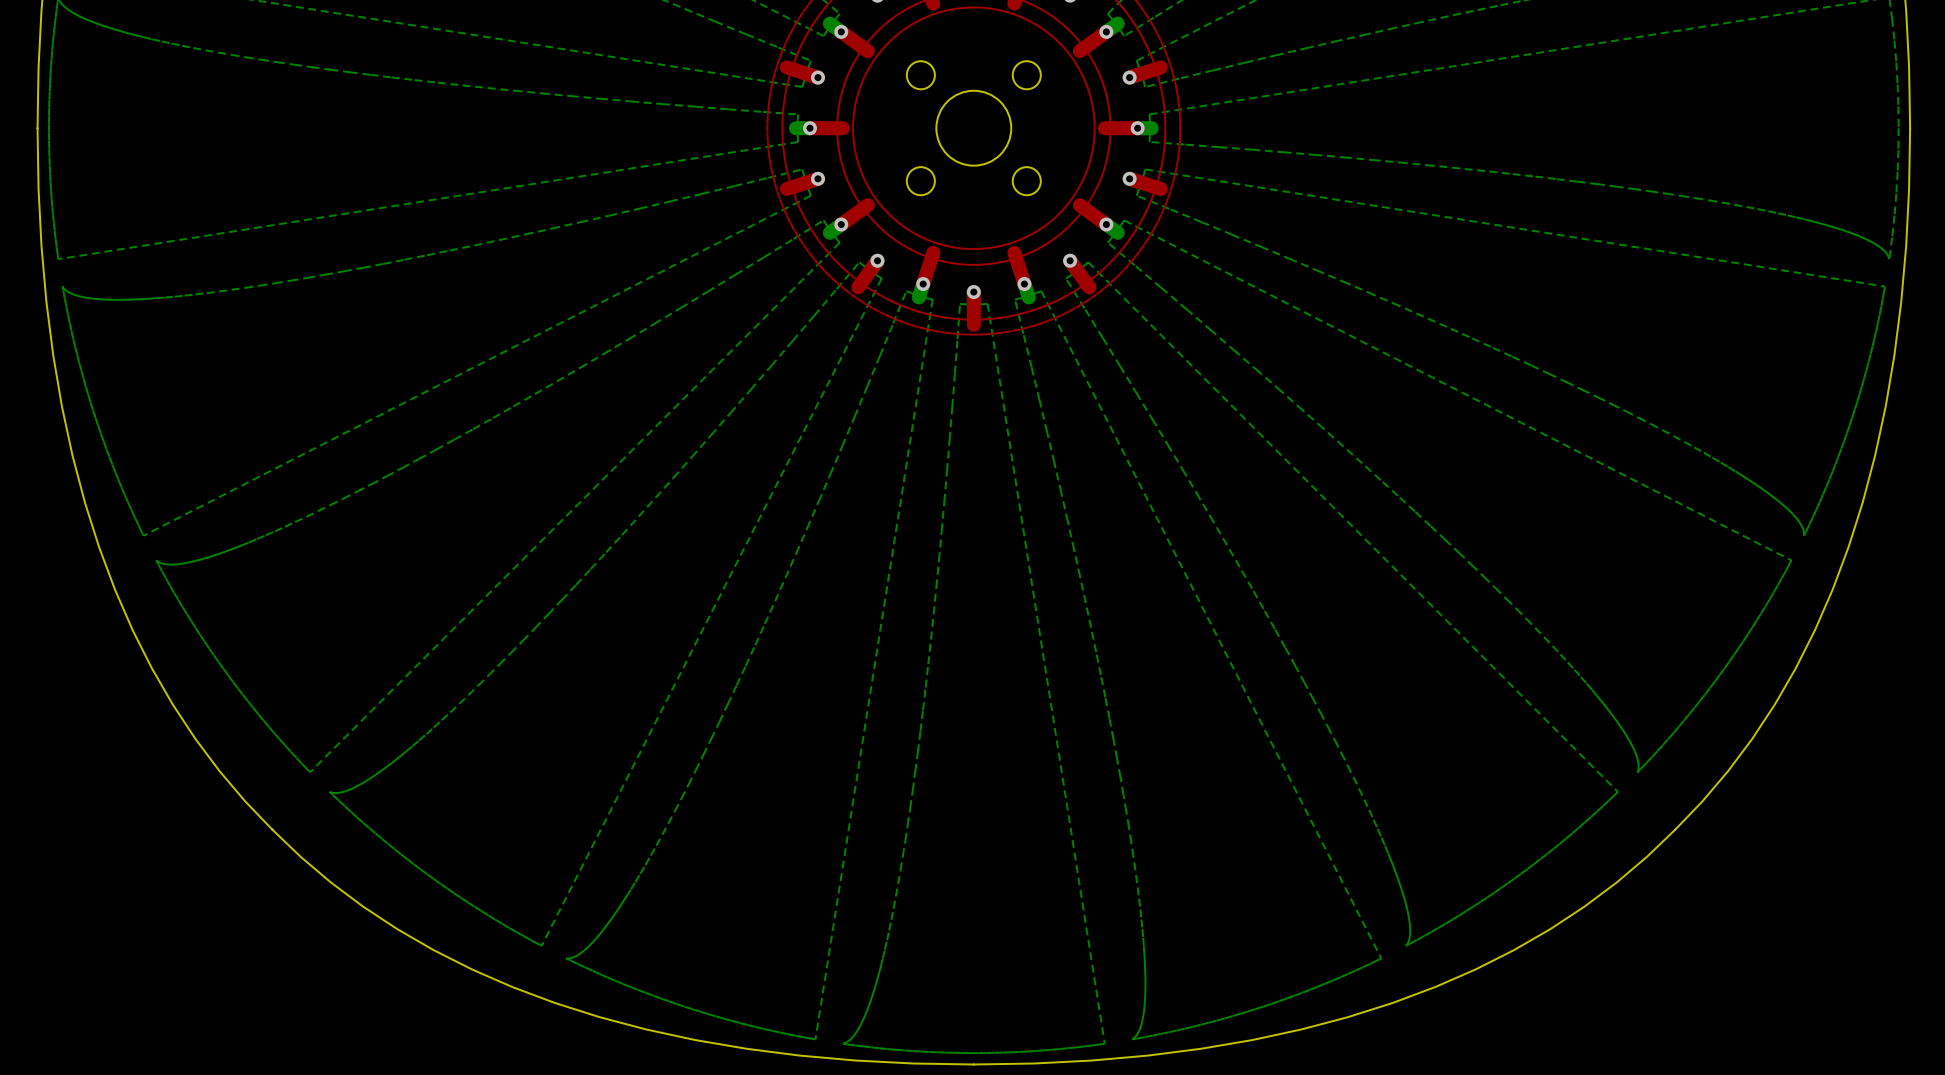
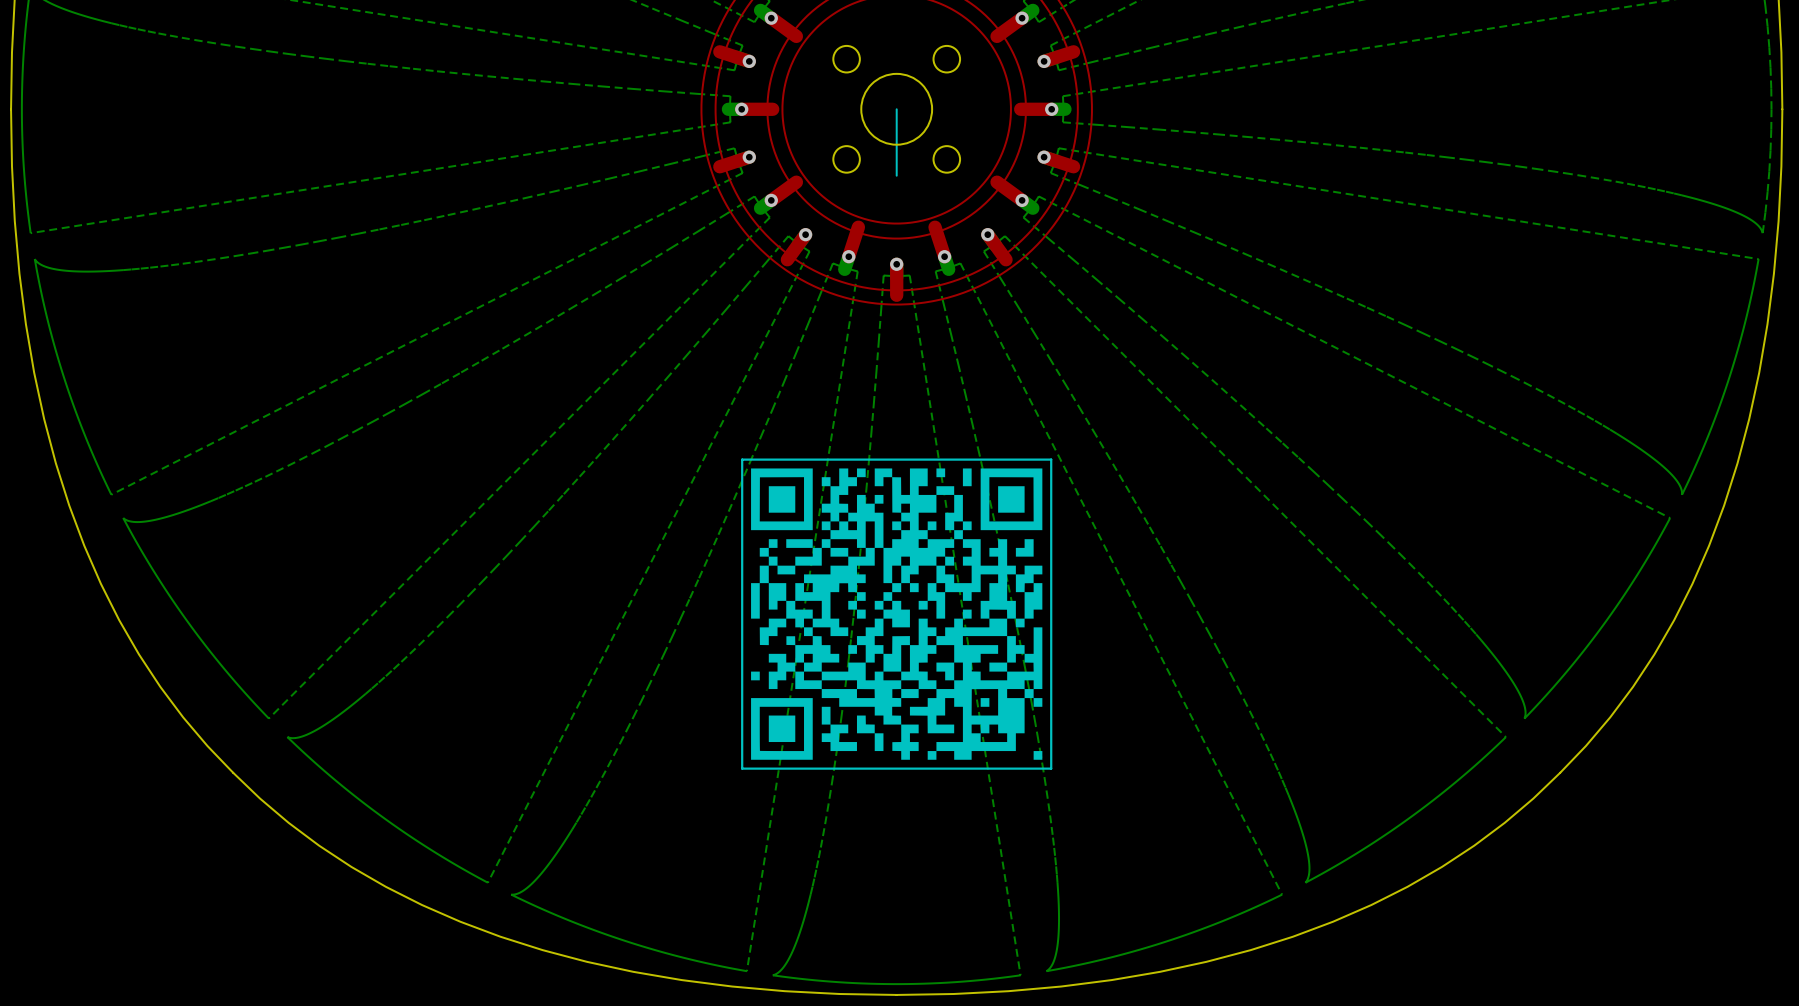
line: none -> (896, 109) (896, 175)
line: none -> (742, 459) (1051, 459) (1051, 768) (742, 768) (742, 459)
drawing: none -> [751, 468, 1043, 760]

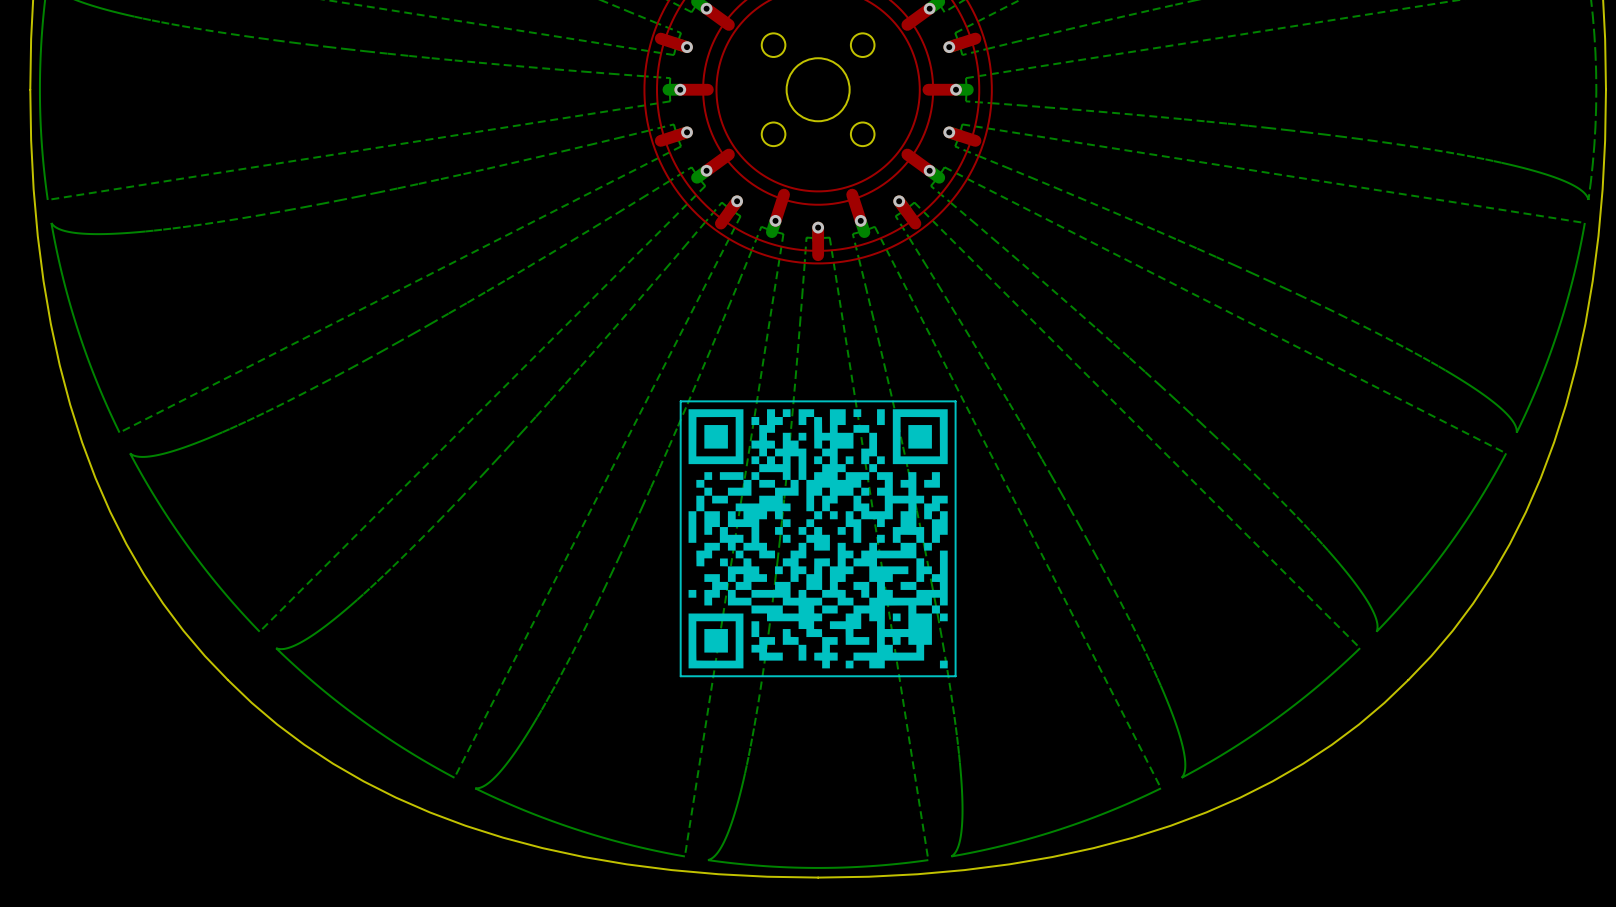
line: (896, 109) (896, 175) -> none

